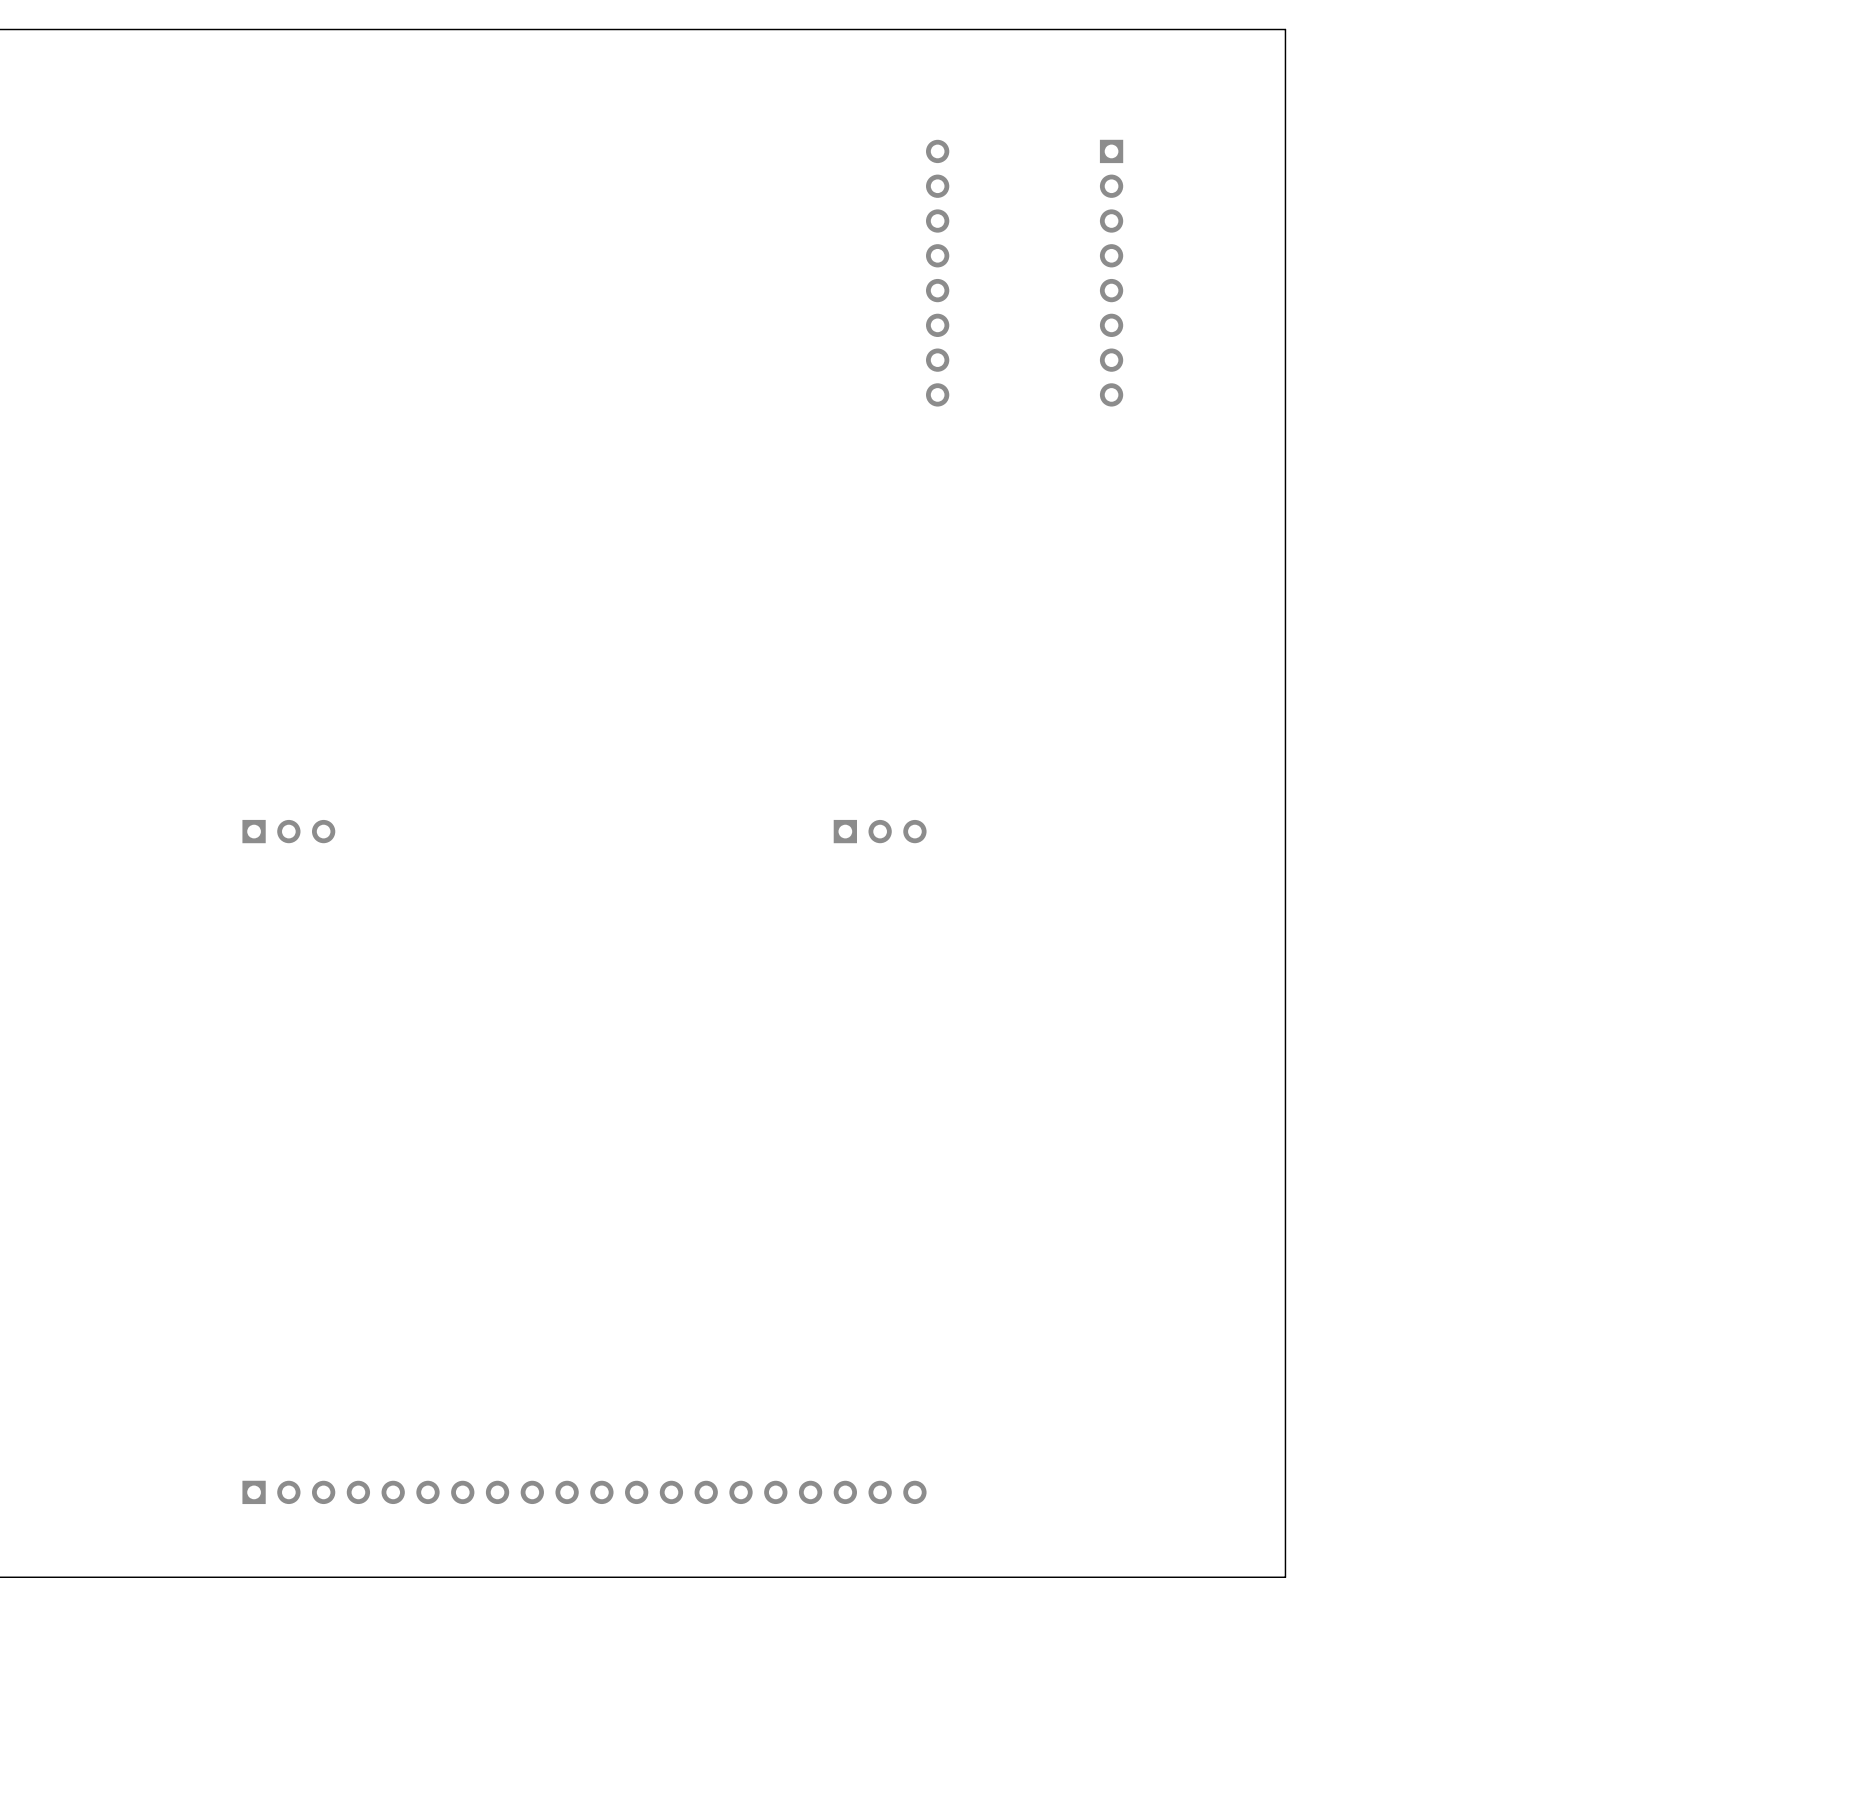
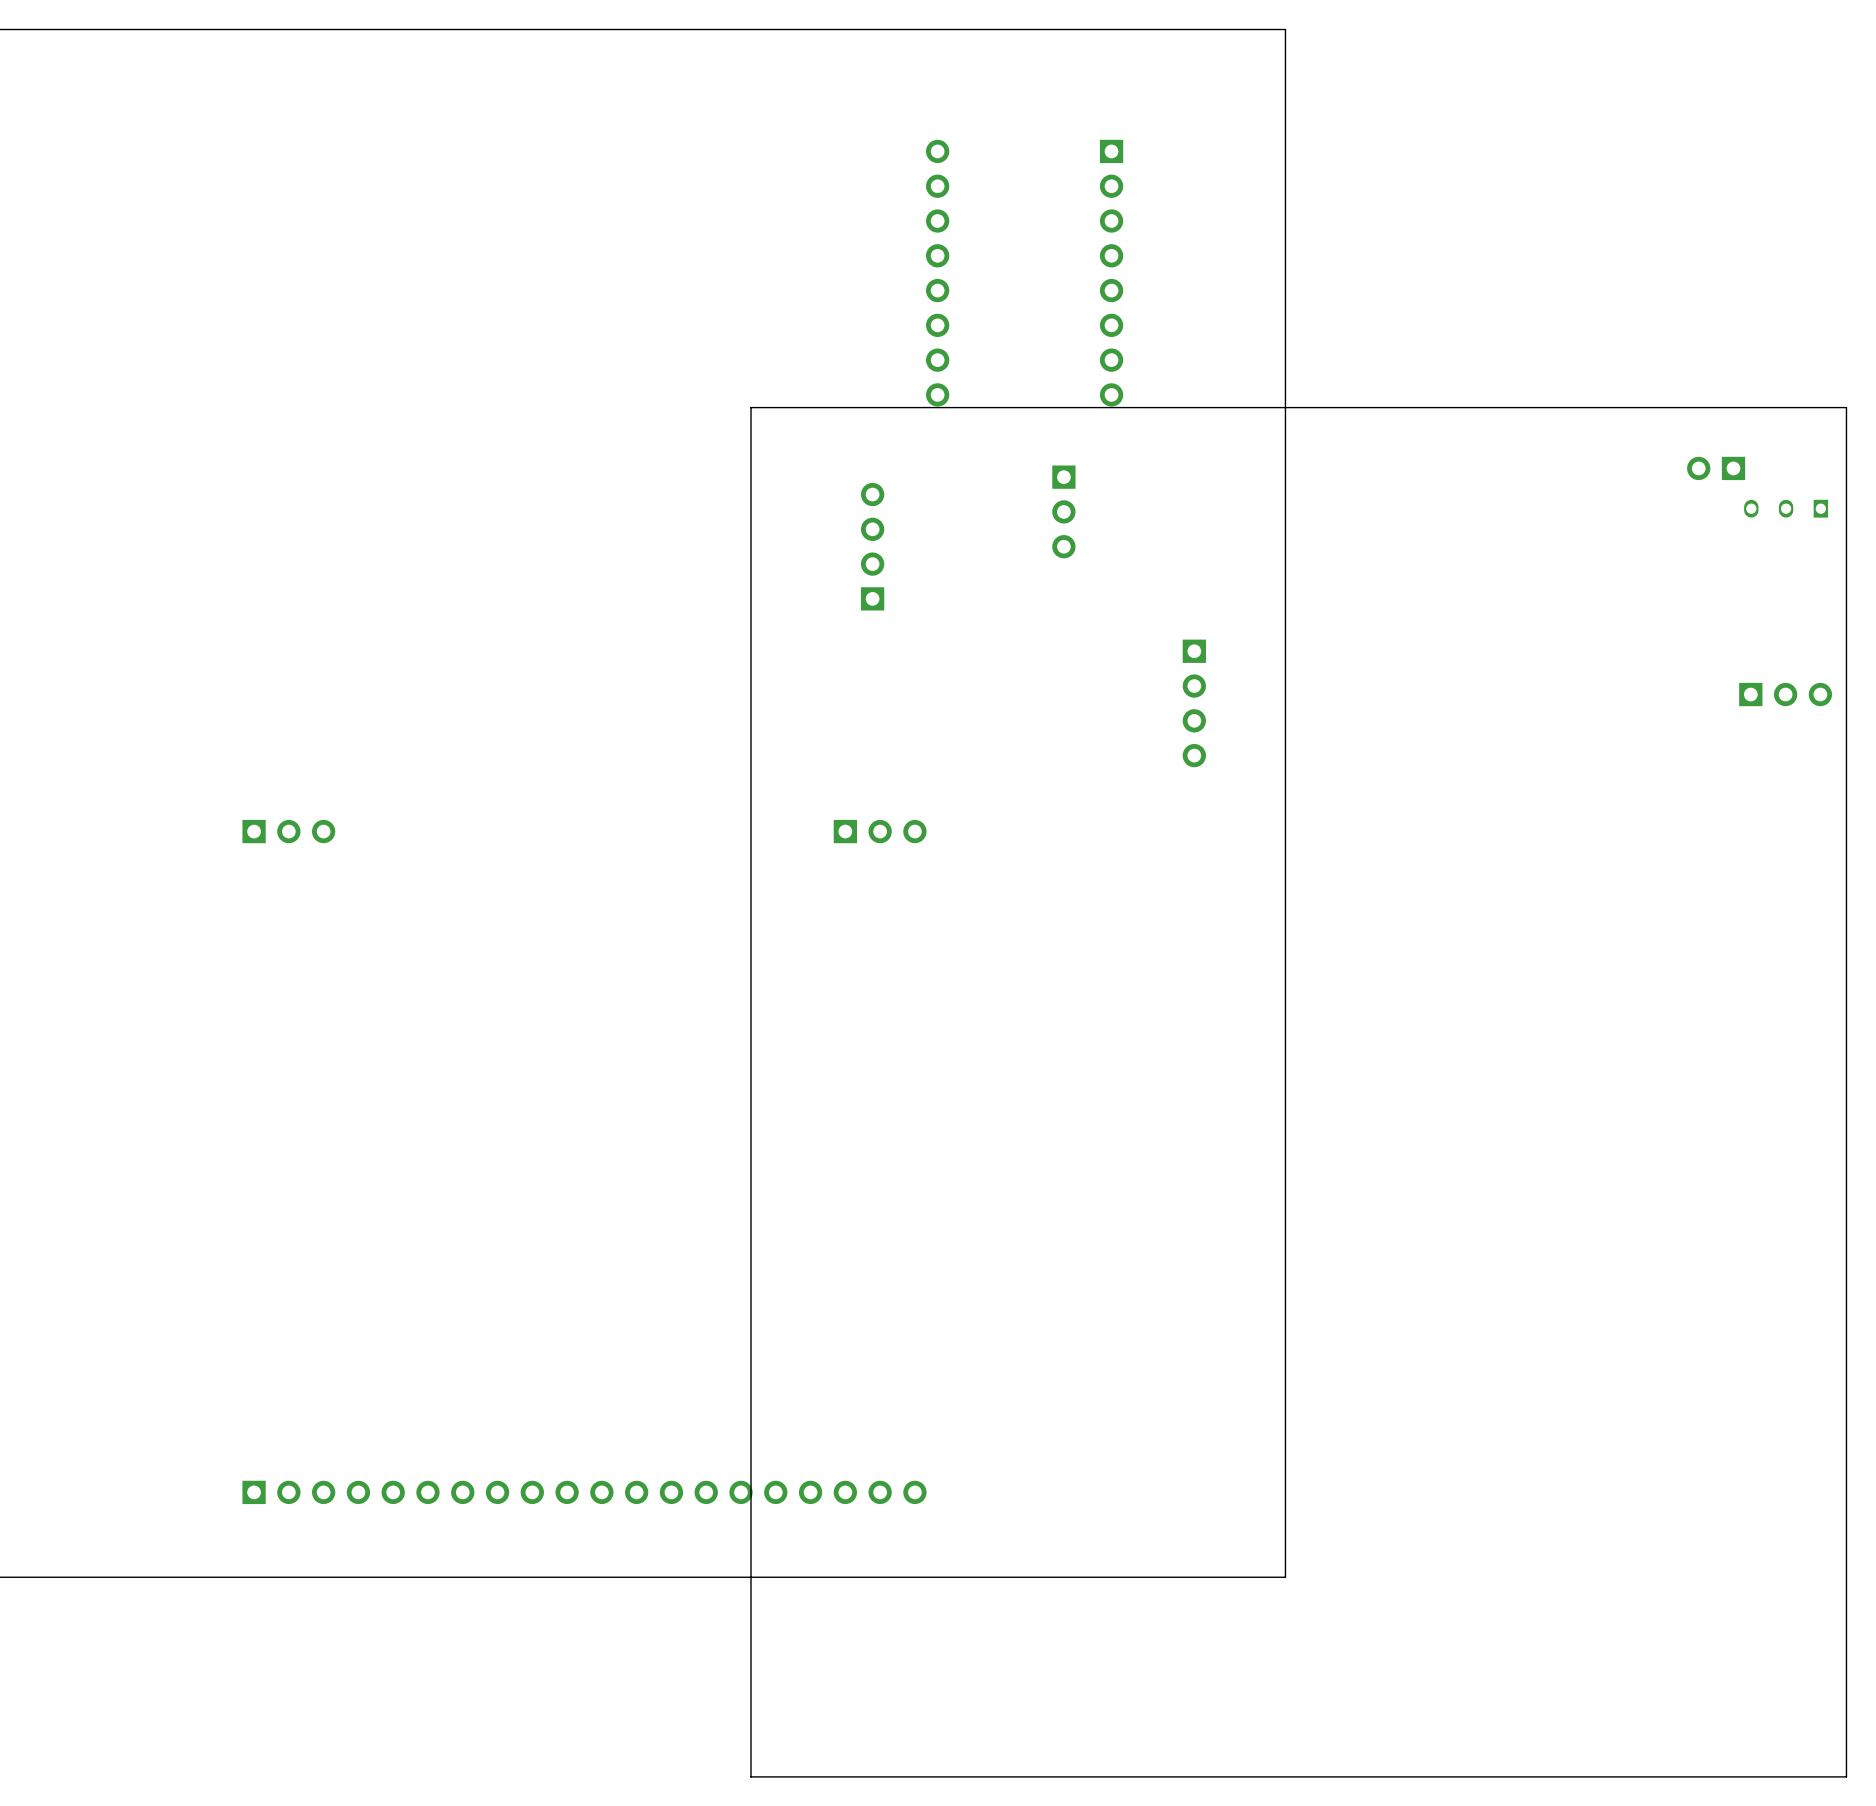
board edge: none -> (1846, 407) (1846, 1776) (751, 1776) (751, 407) (1846, 407)
part: none -> (1716, 468)
part: none -> (1786, 508)
part: none -> (1063, 511)
part: none -> (872, 546)
part: none -> (1785, 694)
part: none -> (1194, 703)

